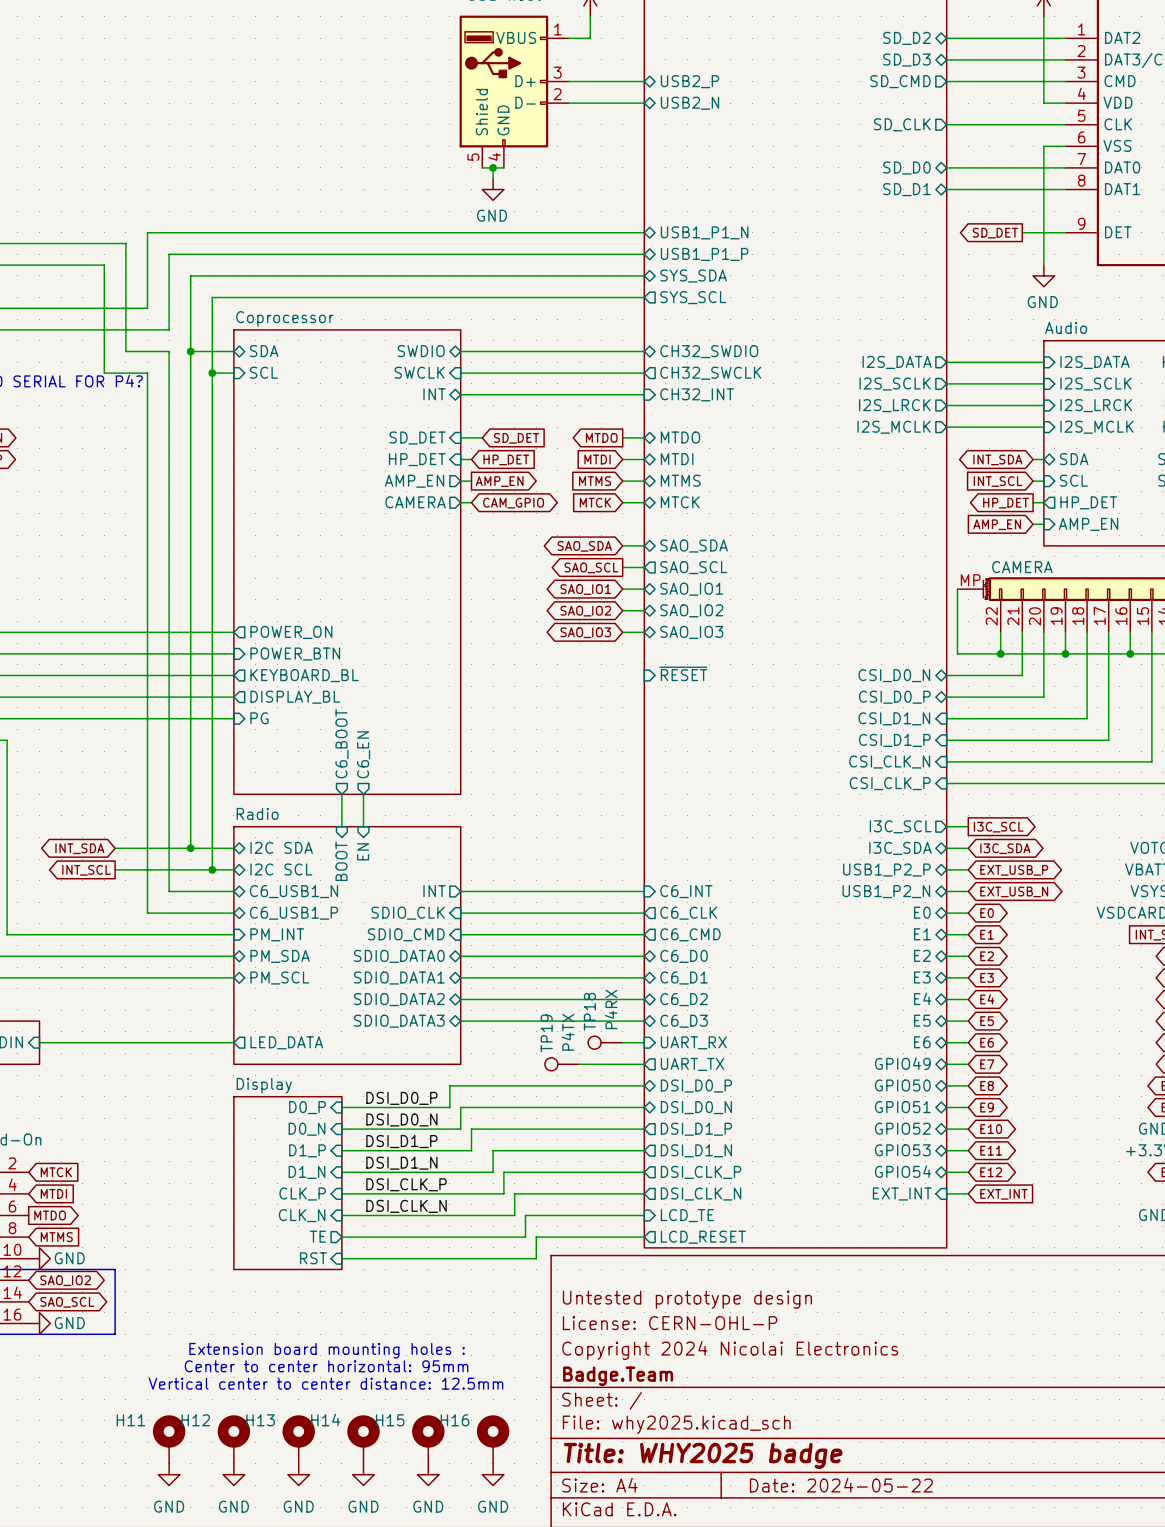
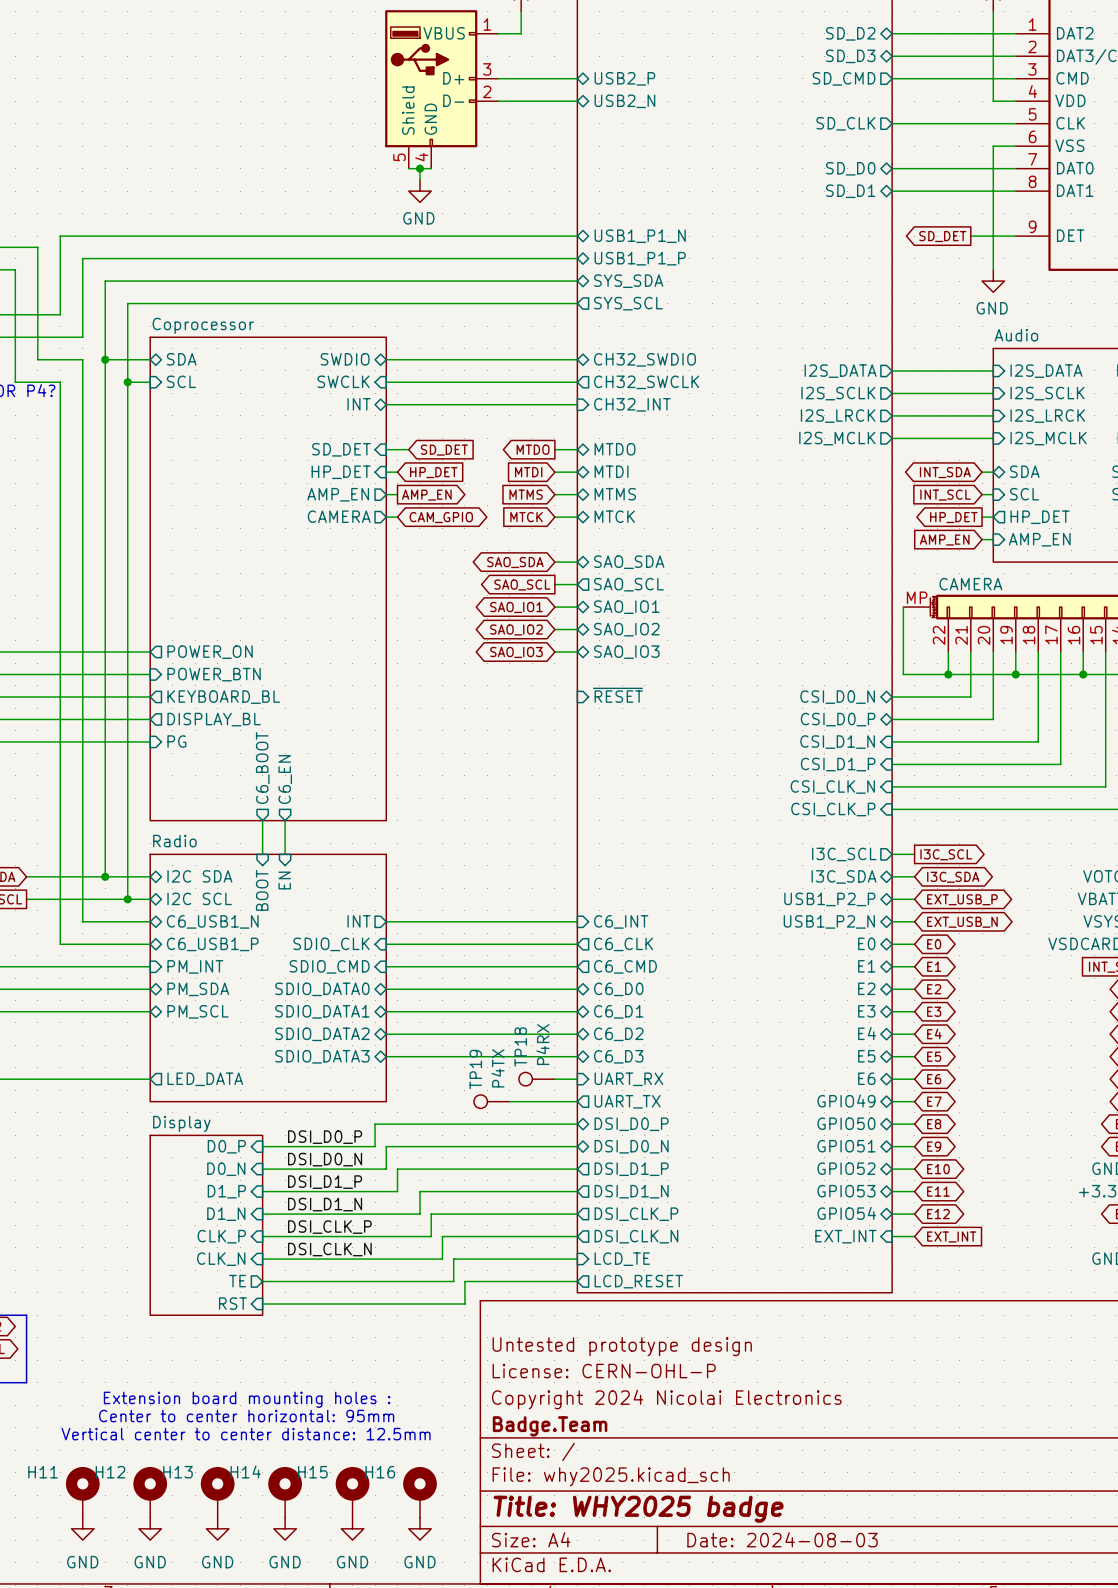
title block: Date: 2024-05-22 (841, 1485) -> Date: 2024-08-03 (782, 1539)

